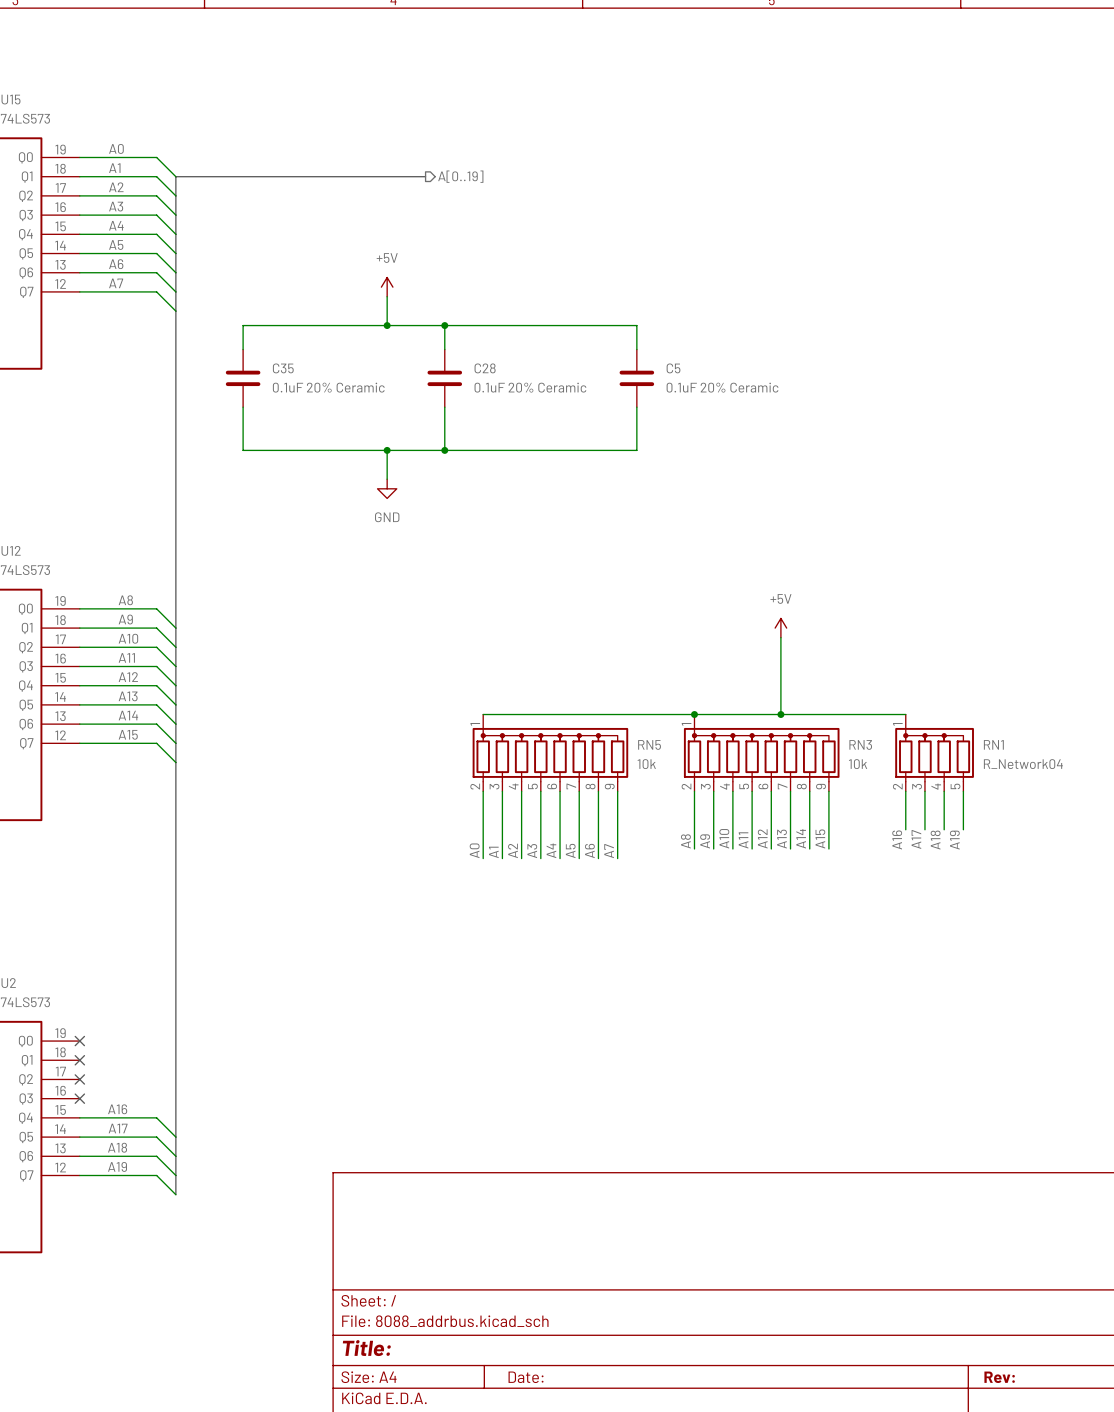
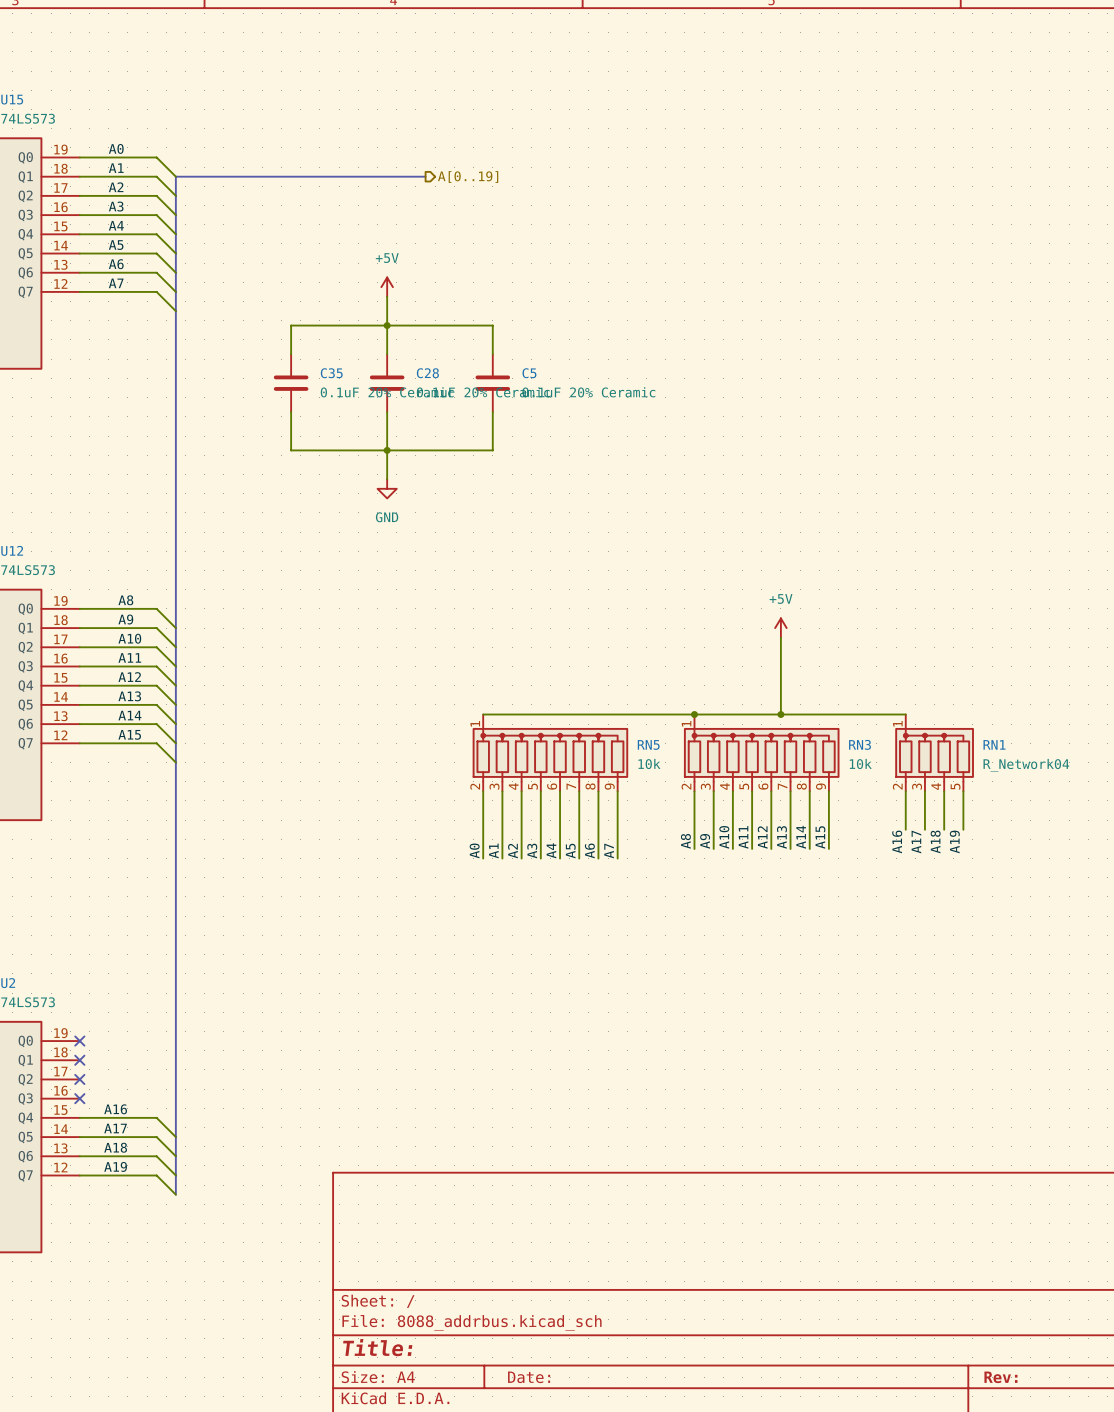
wire: (291, 325) (243, 325) (243, 349) -> (291, 325) (291, 354)
wire: none -> (387, 325) (387, 354)
wire: (444, 325) (444, 349) -> none
junction: (444, 325) -> none
wire: (492, 325) (636, 325) (636, 349) -> (492, 325) (492, 354)
C35 position: (243, 378) -> (291, 383)
C28 position: (444, 378) -> (387, 383)
C5 position: (636, 378) -> (492, 383)
wire: (243, 407) (243, 450) (291, 450) -> (291, 411) (291, 450)
wire: (444, 407) (444, 450) -> none
wire: (636, 407) (636, 450) (492, 450) -> (492, 411) (492, 450)
wire: none -> (387, 411) (387, 450)
junction: (444, 450) -> none

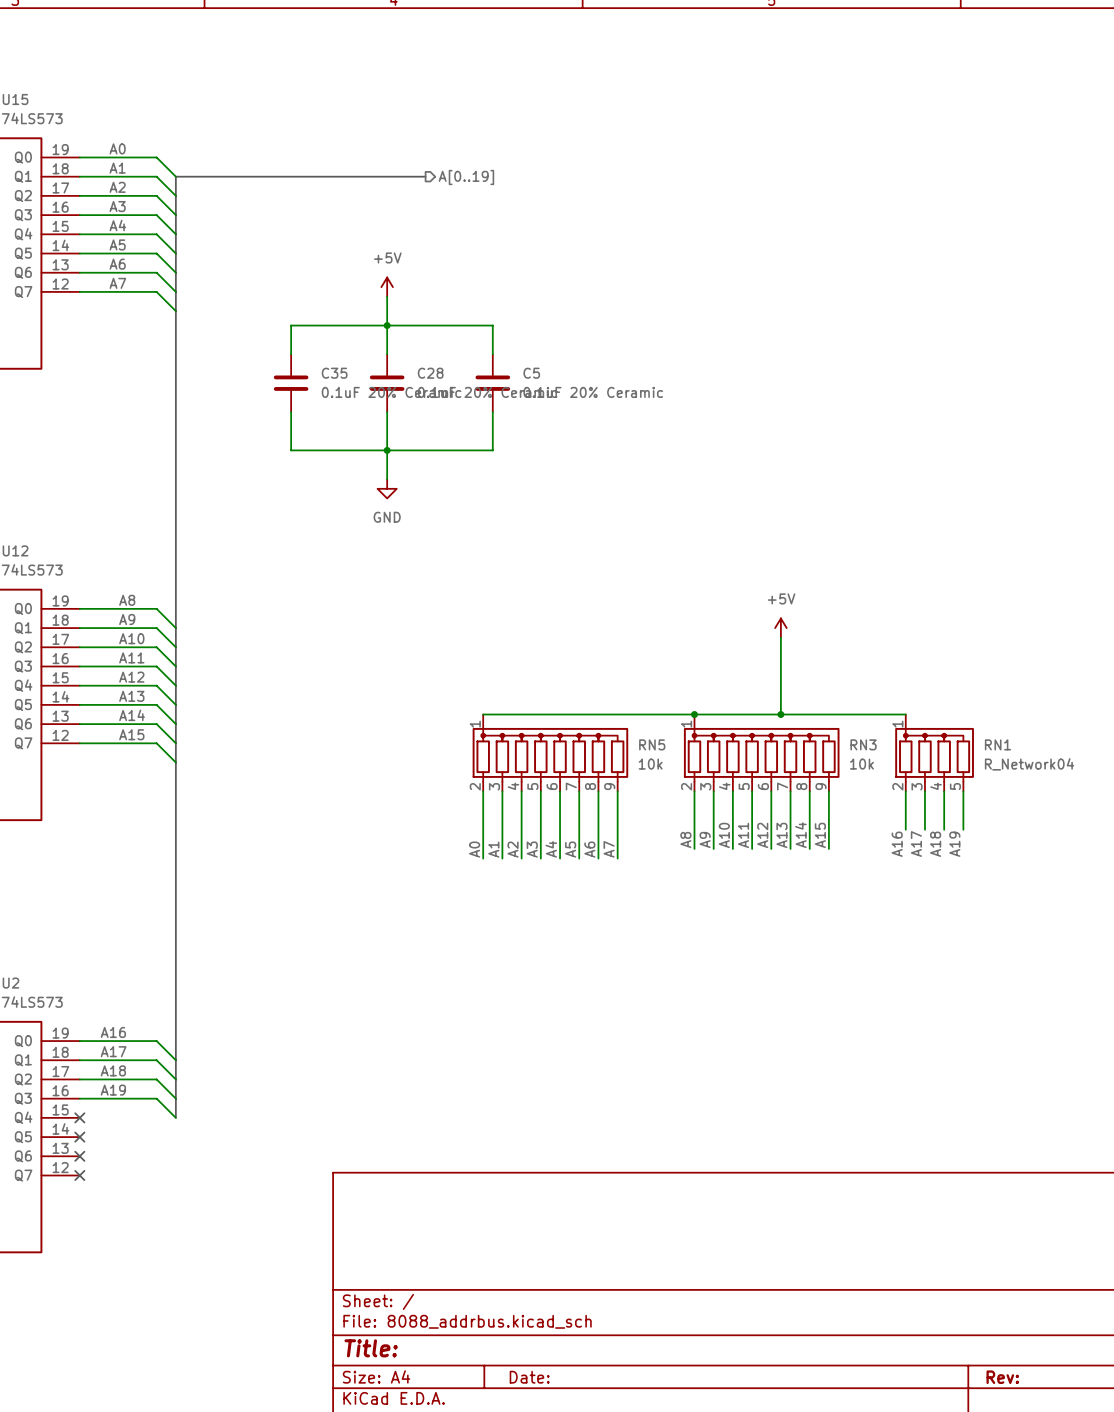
no-connect mark: (79, 1041) -> none
no-connect mark: (79, 1060) -> none
no-connect mark: (79, 1079) -> none
no-connect mark: (79, 1098) -> none
label position: A16 (115, 1109) -> A16 (113, 1032)
wire: (79, 1117) (156, 1117) (175, 1137) -> (79, 1041) (156, 1041) (175, 1060)
no-connect mark: none -> (79, 1117)
bus: (175, 1117) (175, 1194) -> none
label position: A17 (115, 1128) -> A17 (113, 1051)
wire: (79, 1137) (156, 1137) (175, 1156) -> (79, 1060) (156, 1060) (175, 1079)
no-connect mark: none -> (79, 1137)
label position: A18 (115, 1147) -> A18 (113, 1070)
wire: (79, 1156) (156, 1156) (175, 1175) -> (79, 1079) (156, 1079) (175, 1098)
no-connect mark: none -> (79, 1156)
label position: A19 (115, 1166) -> A19 (113, 1090)
wire: (79, 1175) (156, 1175) (175, 1194) -> (79, 1098) (156, 1098) (175, 1117)
no-connect mark: none -> (79, 1175)

